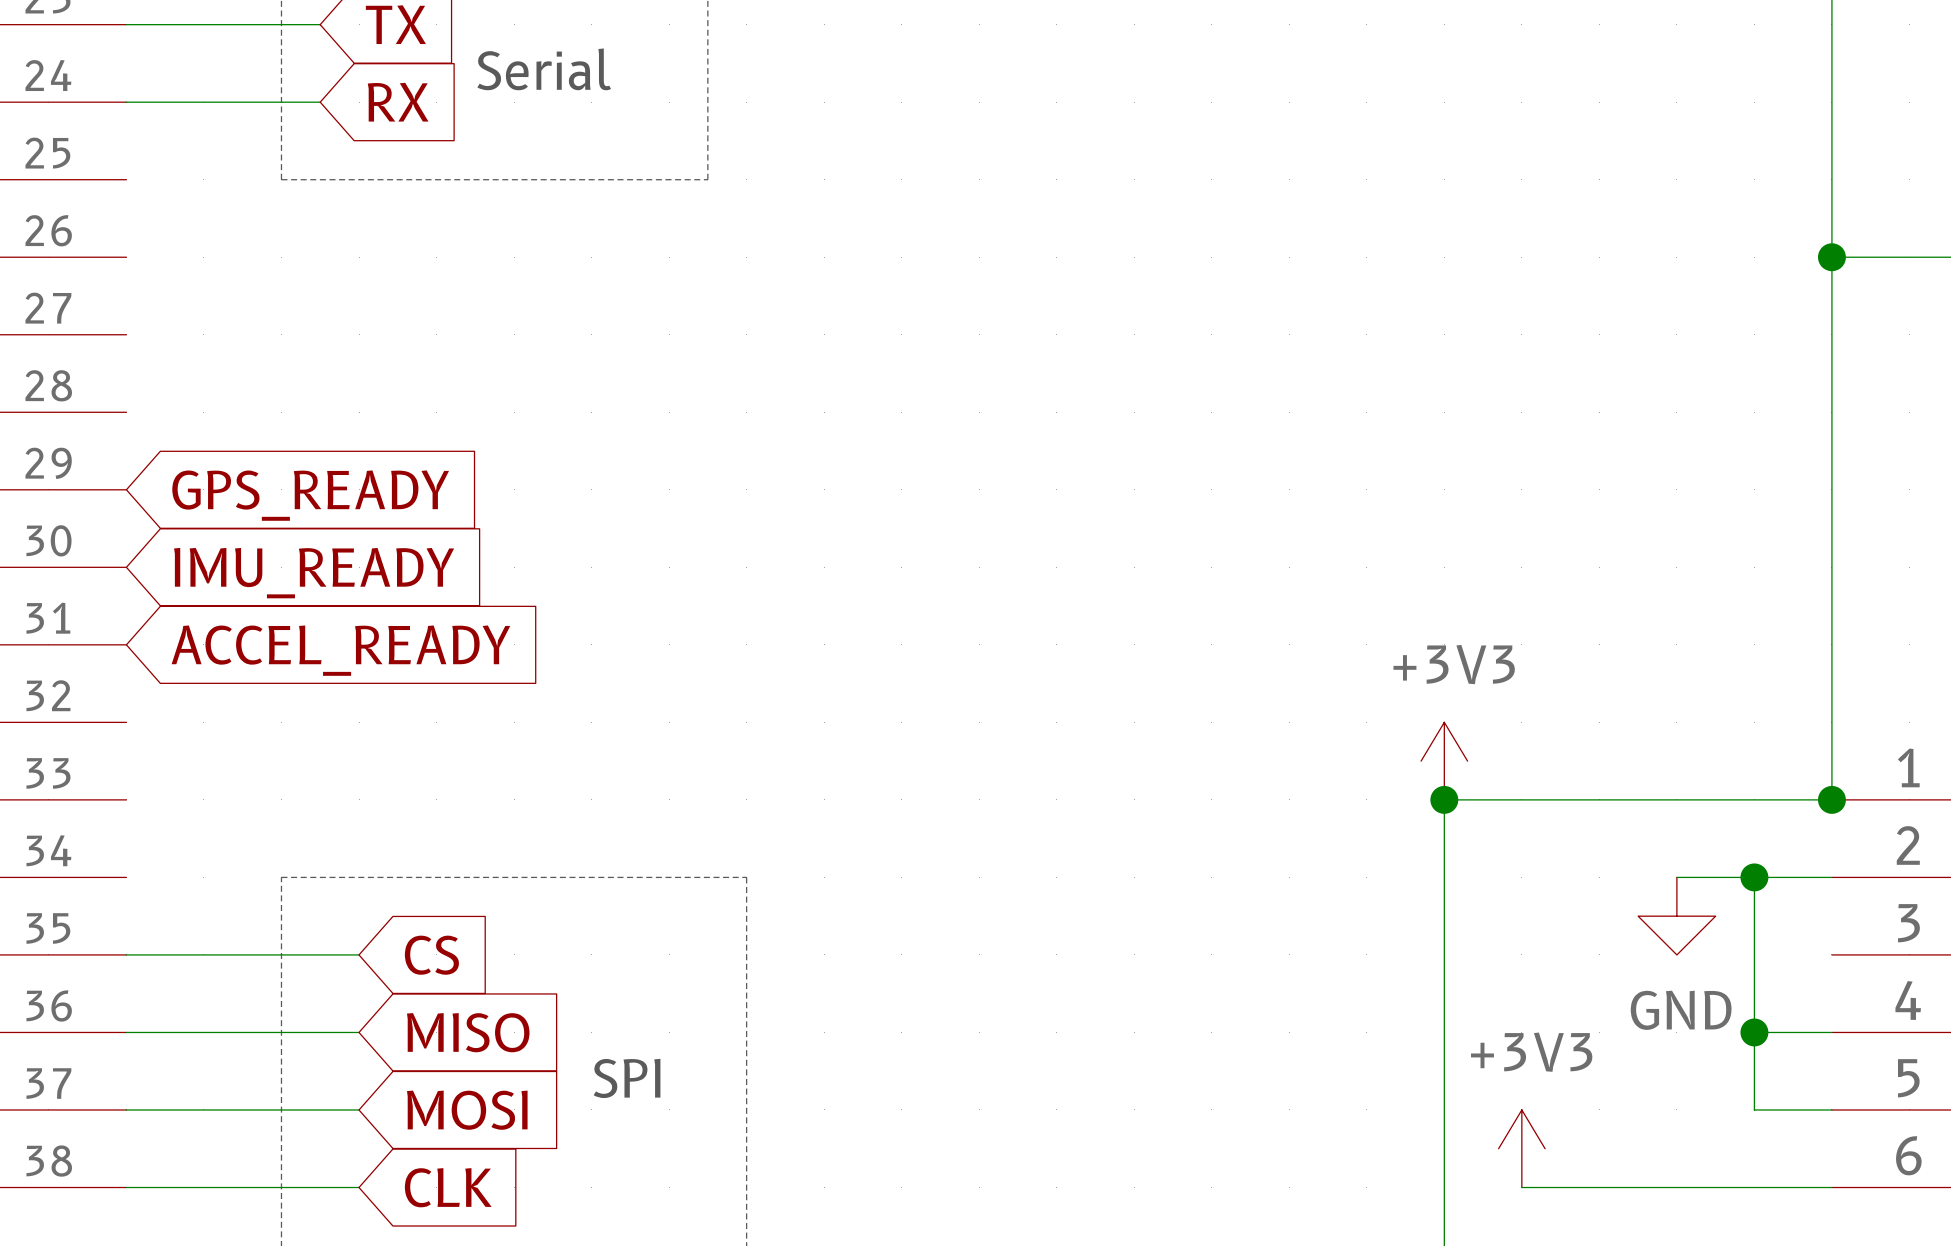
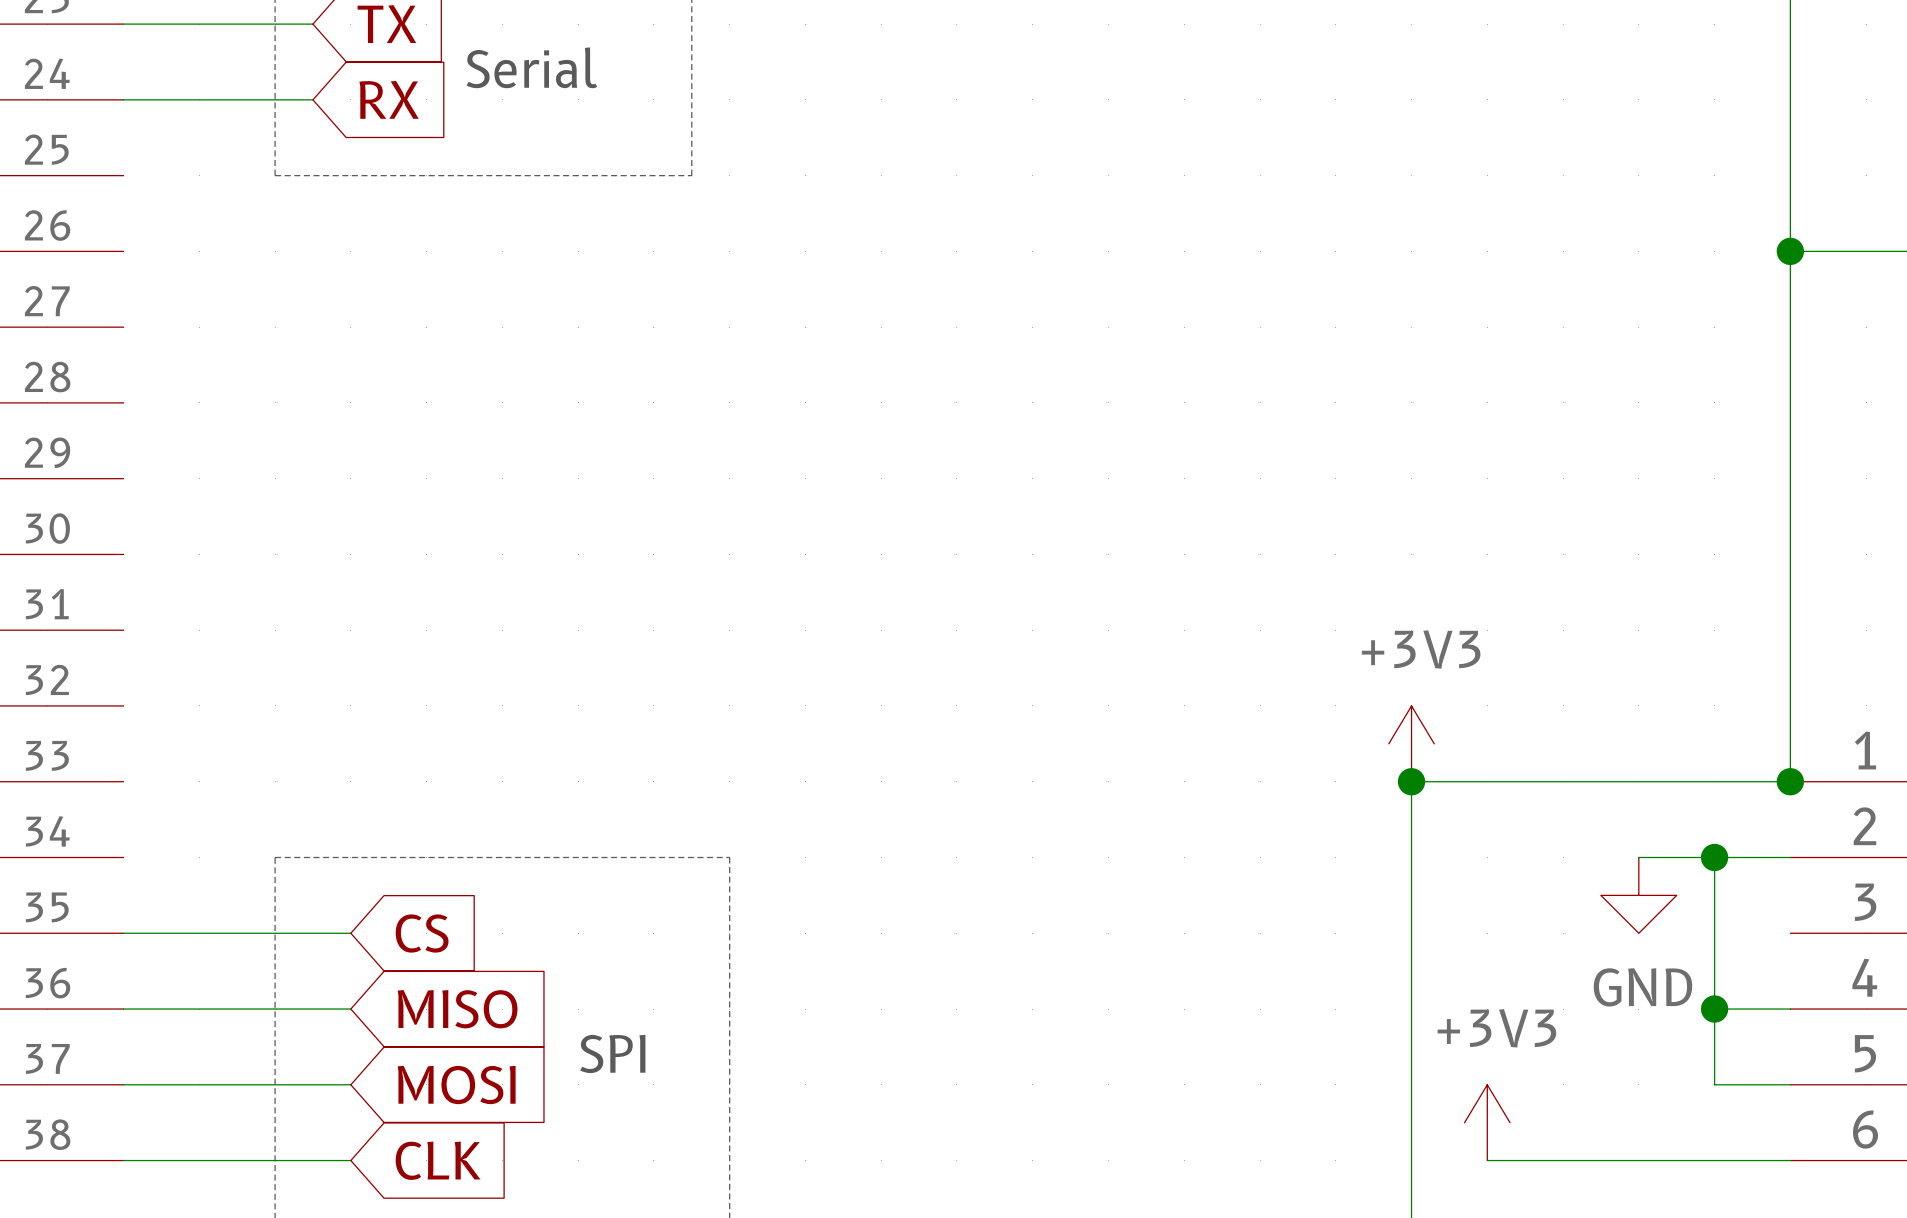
global label: GPS_READY (310, 495) -> none
global label: IMU_READY (314, 573) -> none
global label: ACCEL_READY (340, 650) -> none

